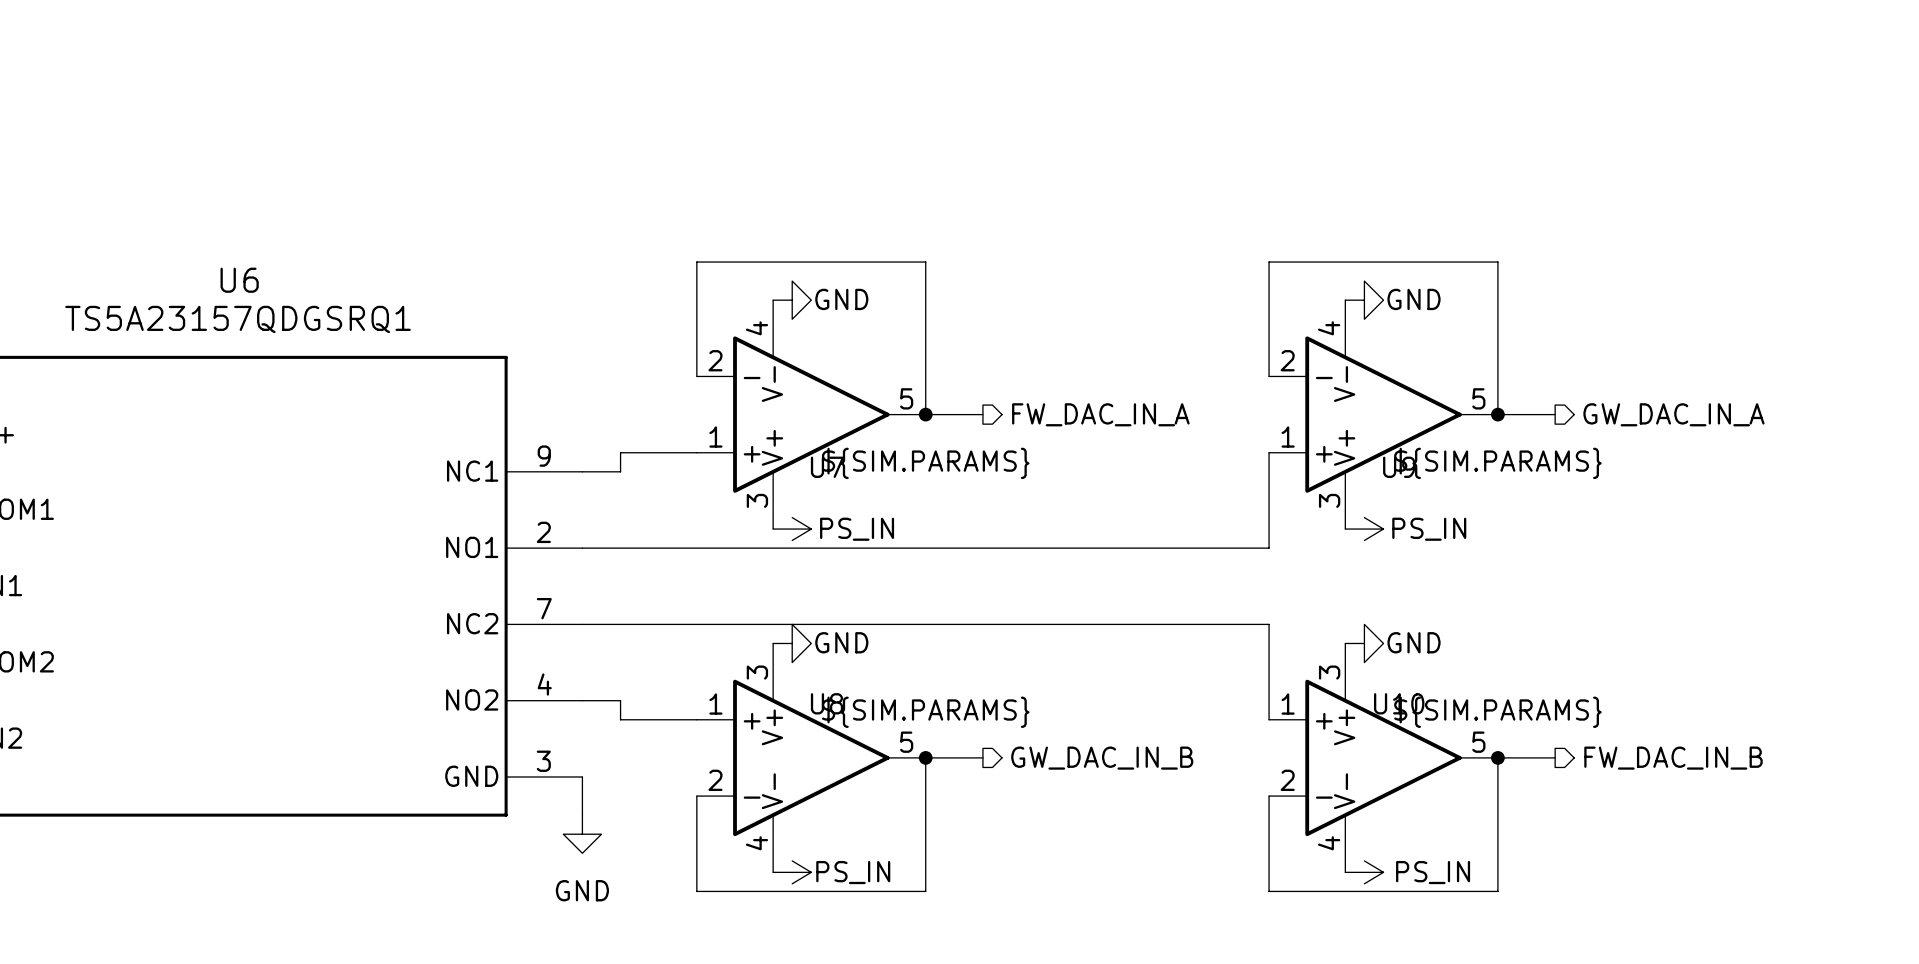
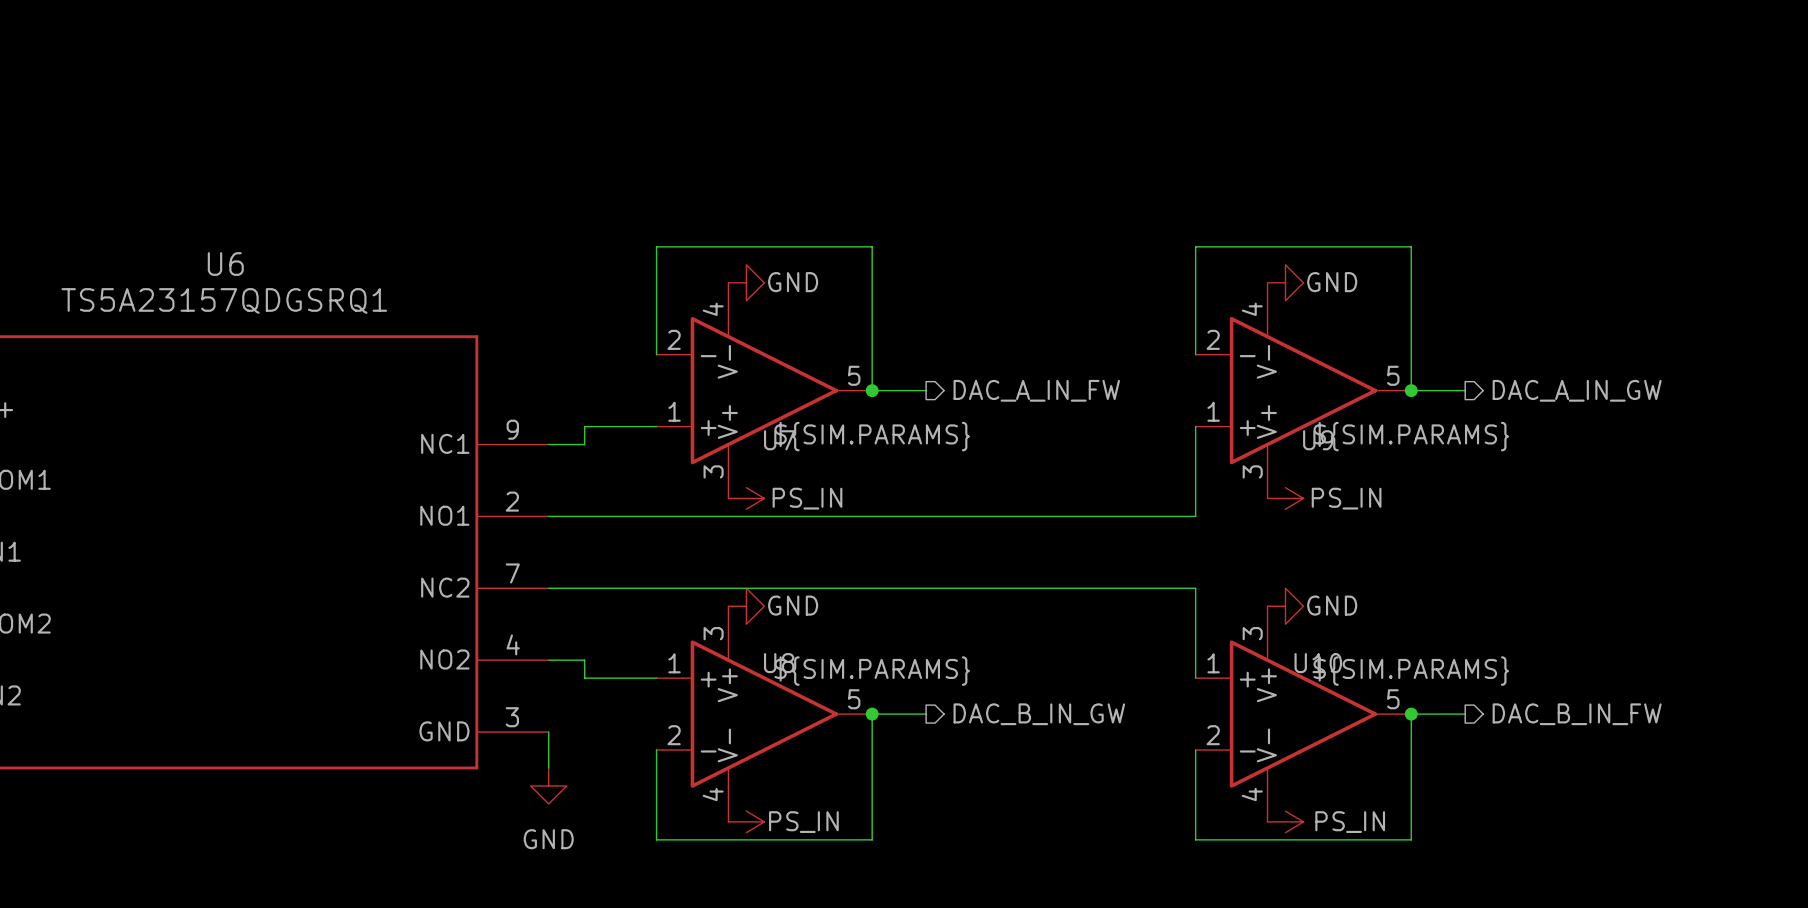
hierarchical label: FW_DAC_IN_A (1100, 414) -> DAC_A_IN_FW (1036, 390)
hierarchical label: GW_DAC_IN_A (1673, 414) -> DAC_A_IN_GW (1577, 390)
hierarchical label: GW_DAC_IN_B (1102, 758) -> DAC_B_IN_GW (1039, 714)
hierarchical label: FW_DAC_IN_B (1673, 758) -> DAC_B_IN_FW (1577, 714)

